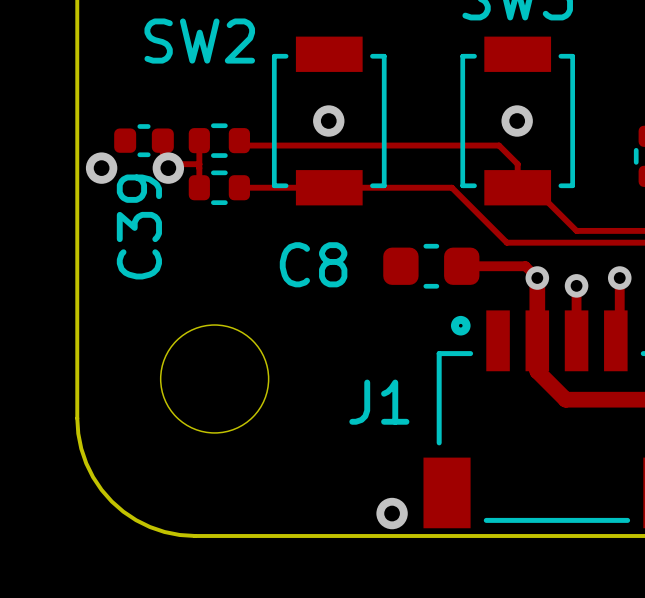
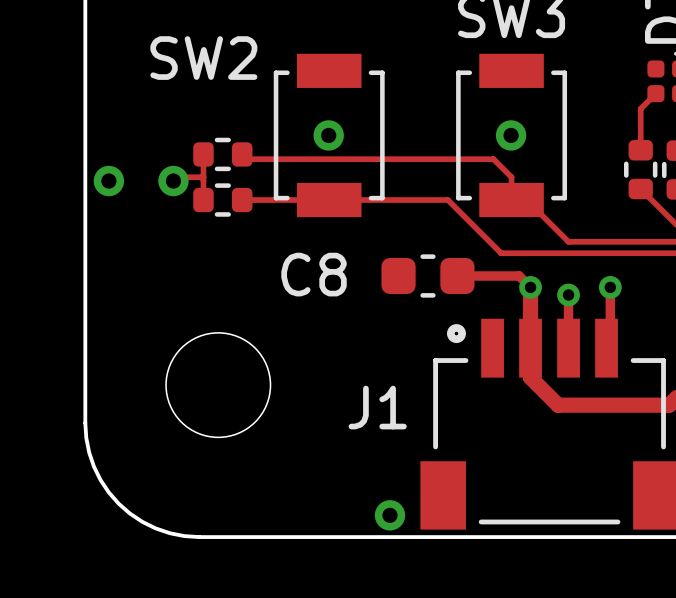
C39: (144, 140) -> none

